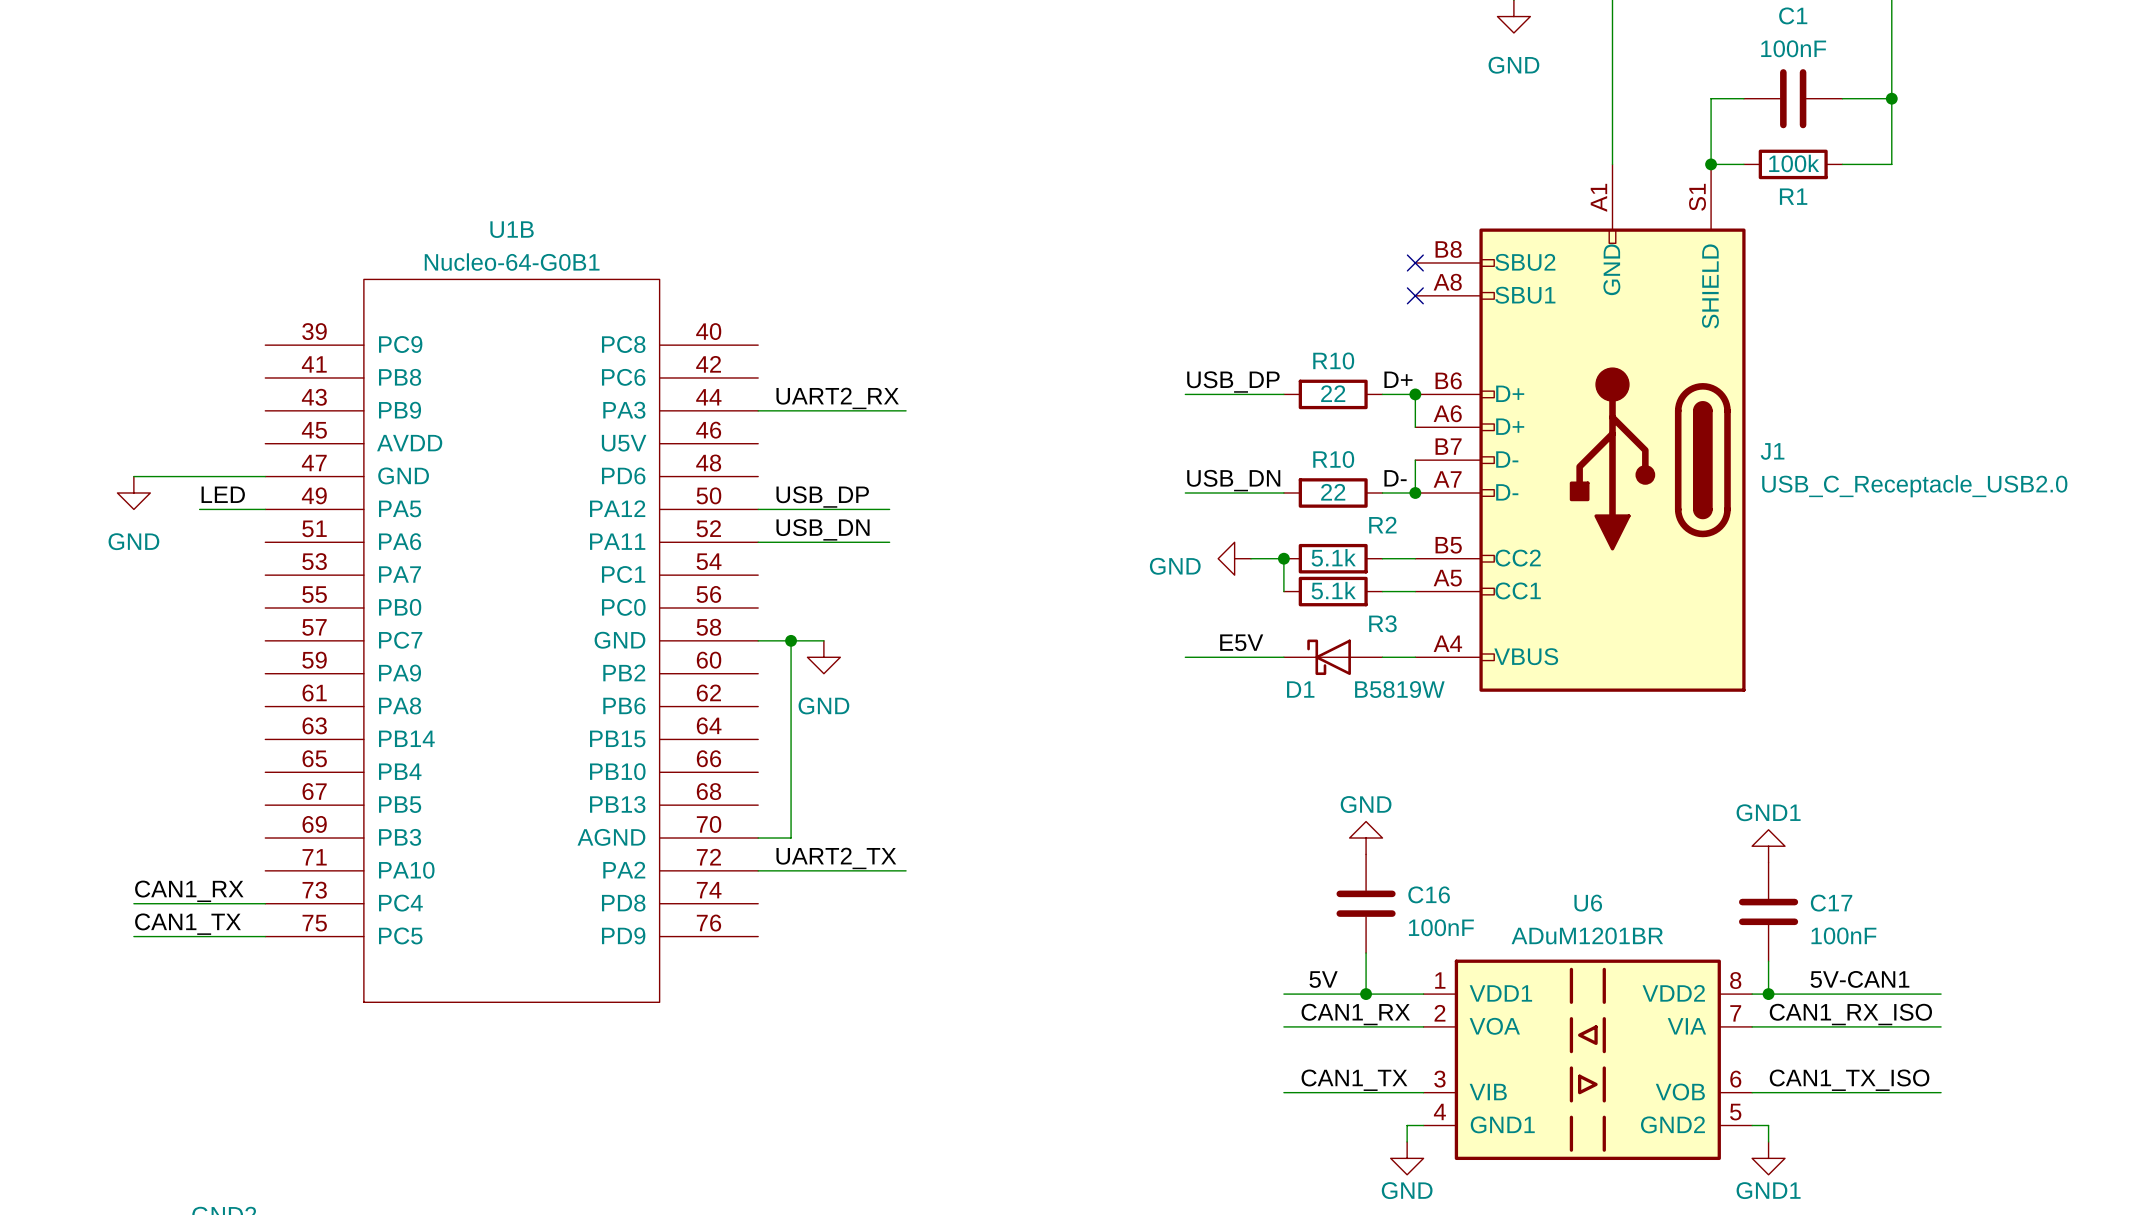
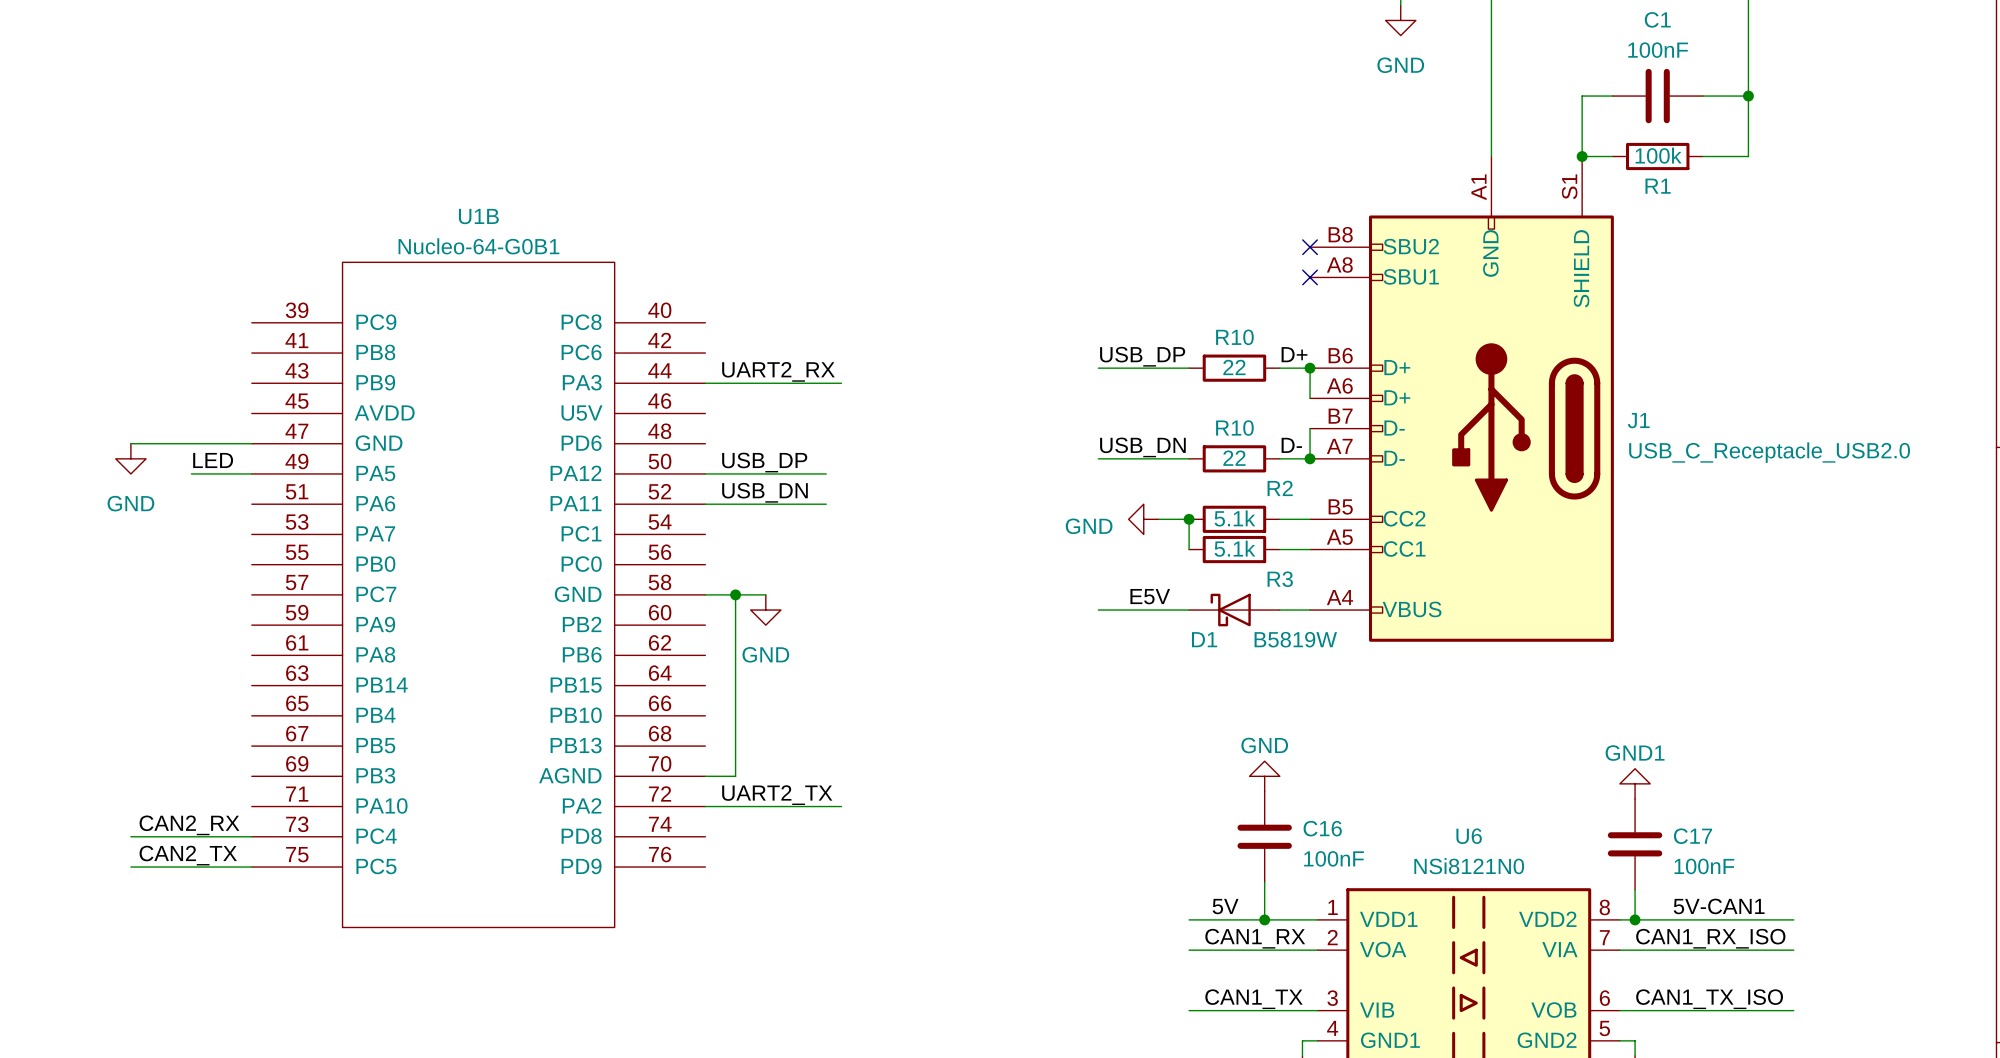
label: CAN1_RX (189, 891) -> CAN2_RX (189, 825)
label: CAN1_TX (187, 924) -> CAN2_TX (188, 855)
U6 value: ADuM1201BR (1587, 935) -> NSi8121N0 (1469, 866)

